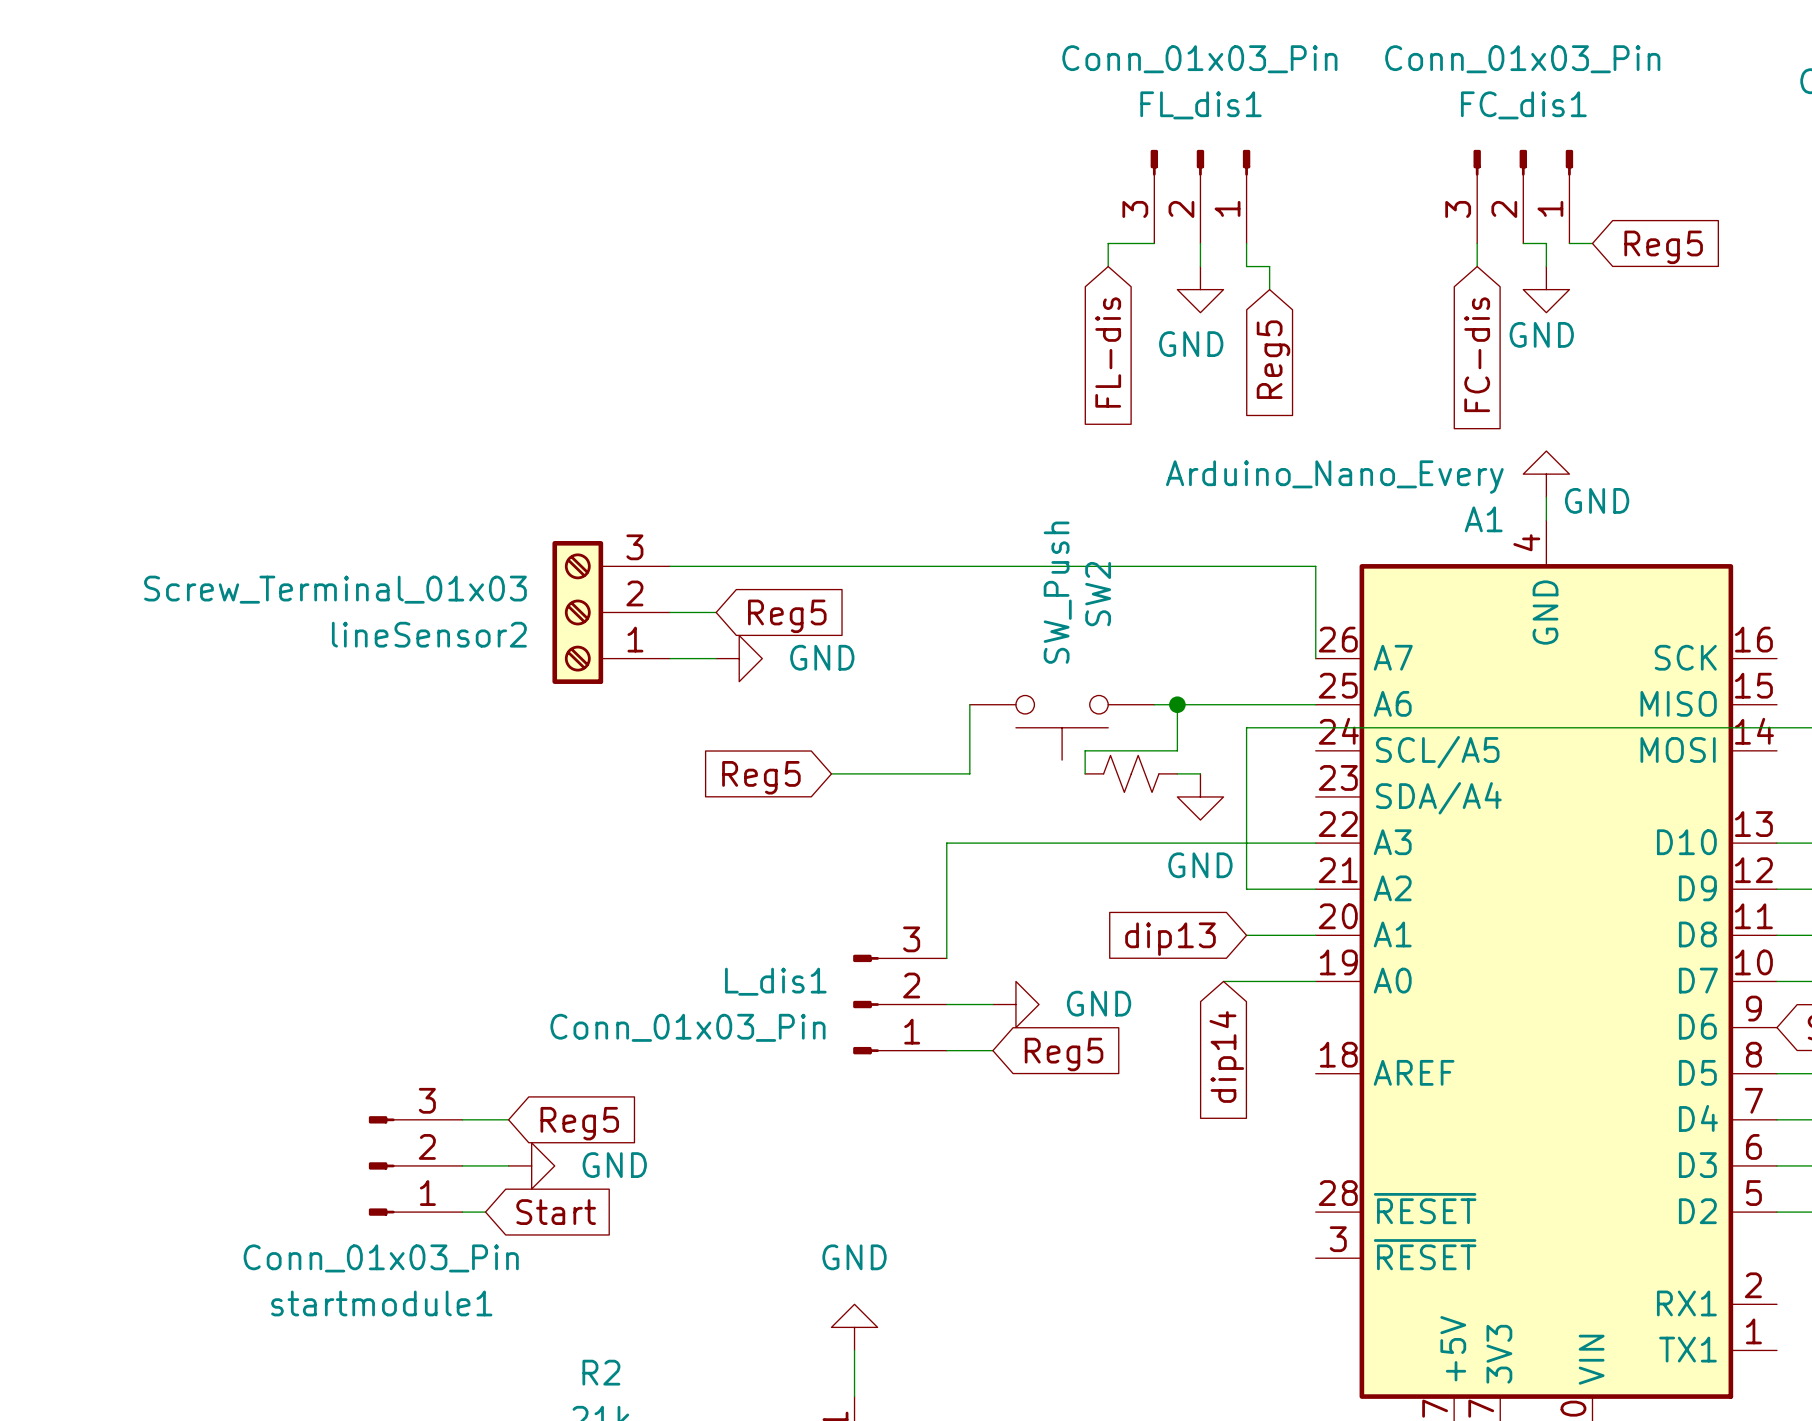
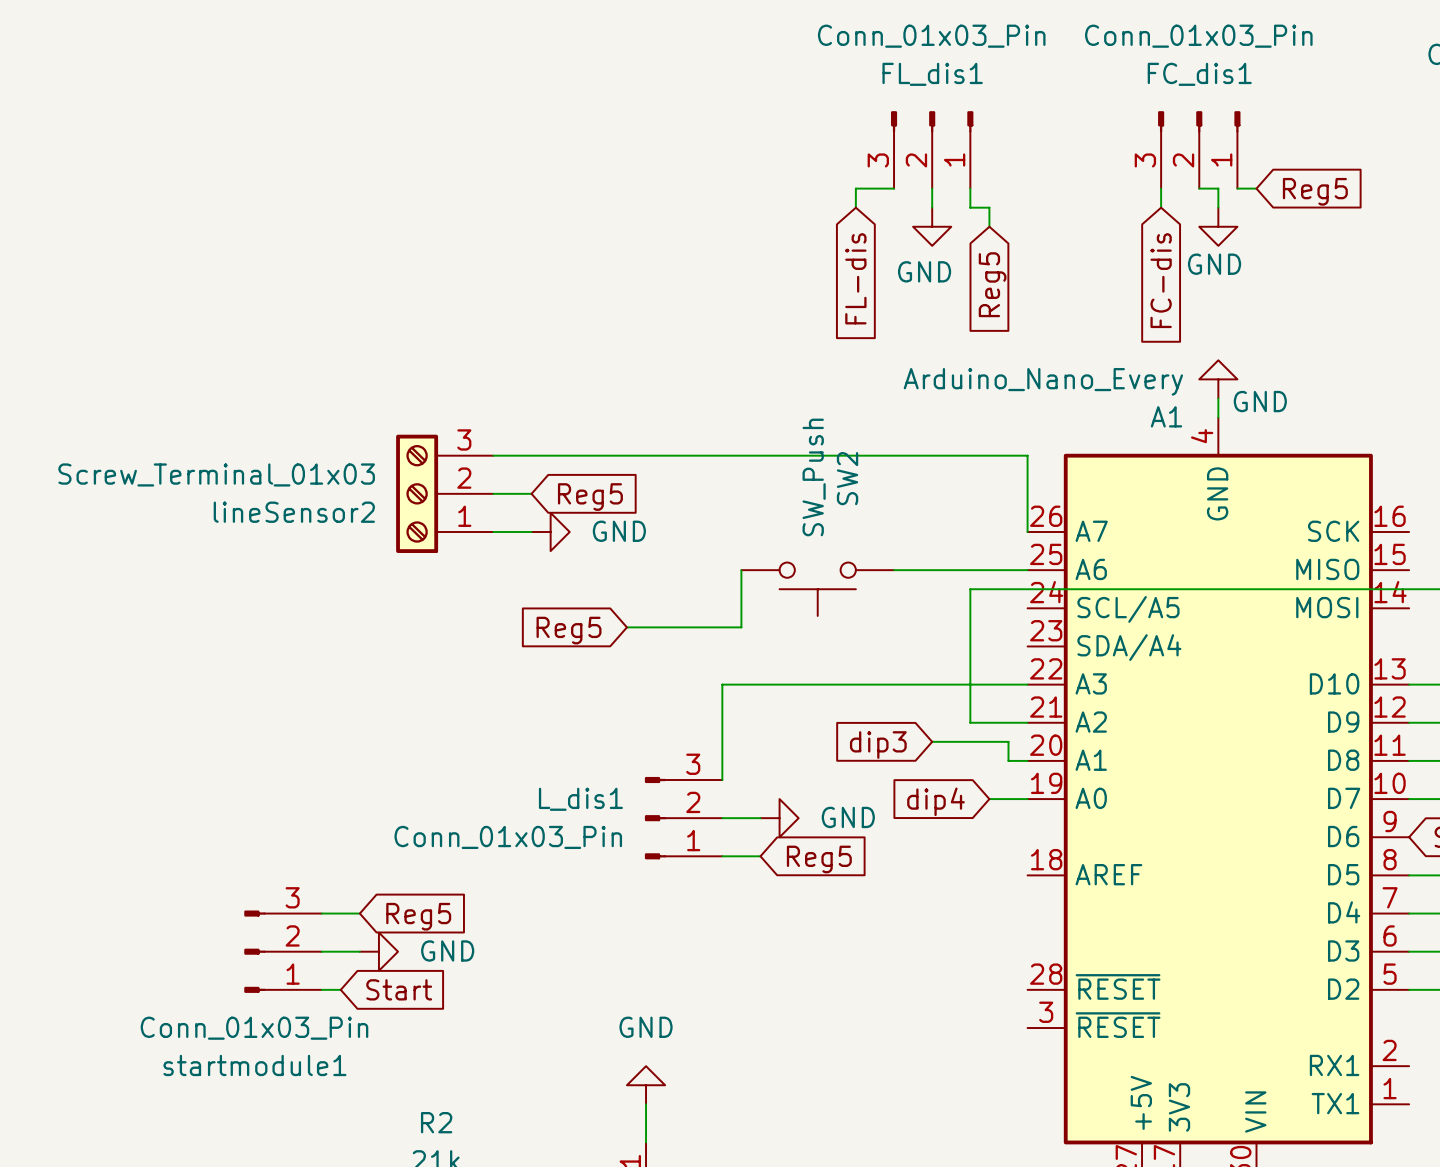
wire: (1177, 704) (1177, 750) (1085, 750) (1085, 773) -> none
junction: (1177, 704) -> none
part: (1131, 773) -> none
wire: (1177, 773) (1200, 773) -> none
power symbol: GND (1200, 796) -> none
global label: none -> dip3 (878, 745)
wire: (1246, 935) (1292, 935) -> (932, 741) (1008, 741) (1008, 760)
global label: dip13 (1170, 939) -> none
wire: (1223, 981) (1269, 981) -> none
global label: none -> dip4 (936, 801)
global label: dip14 (1226, 1056) -> none

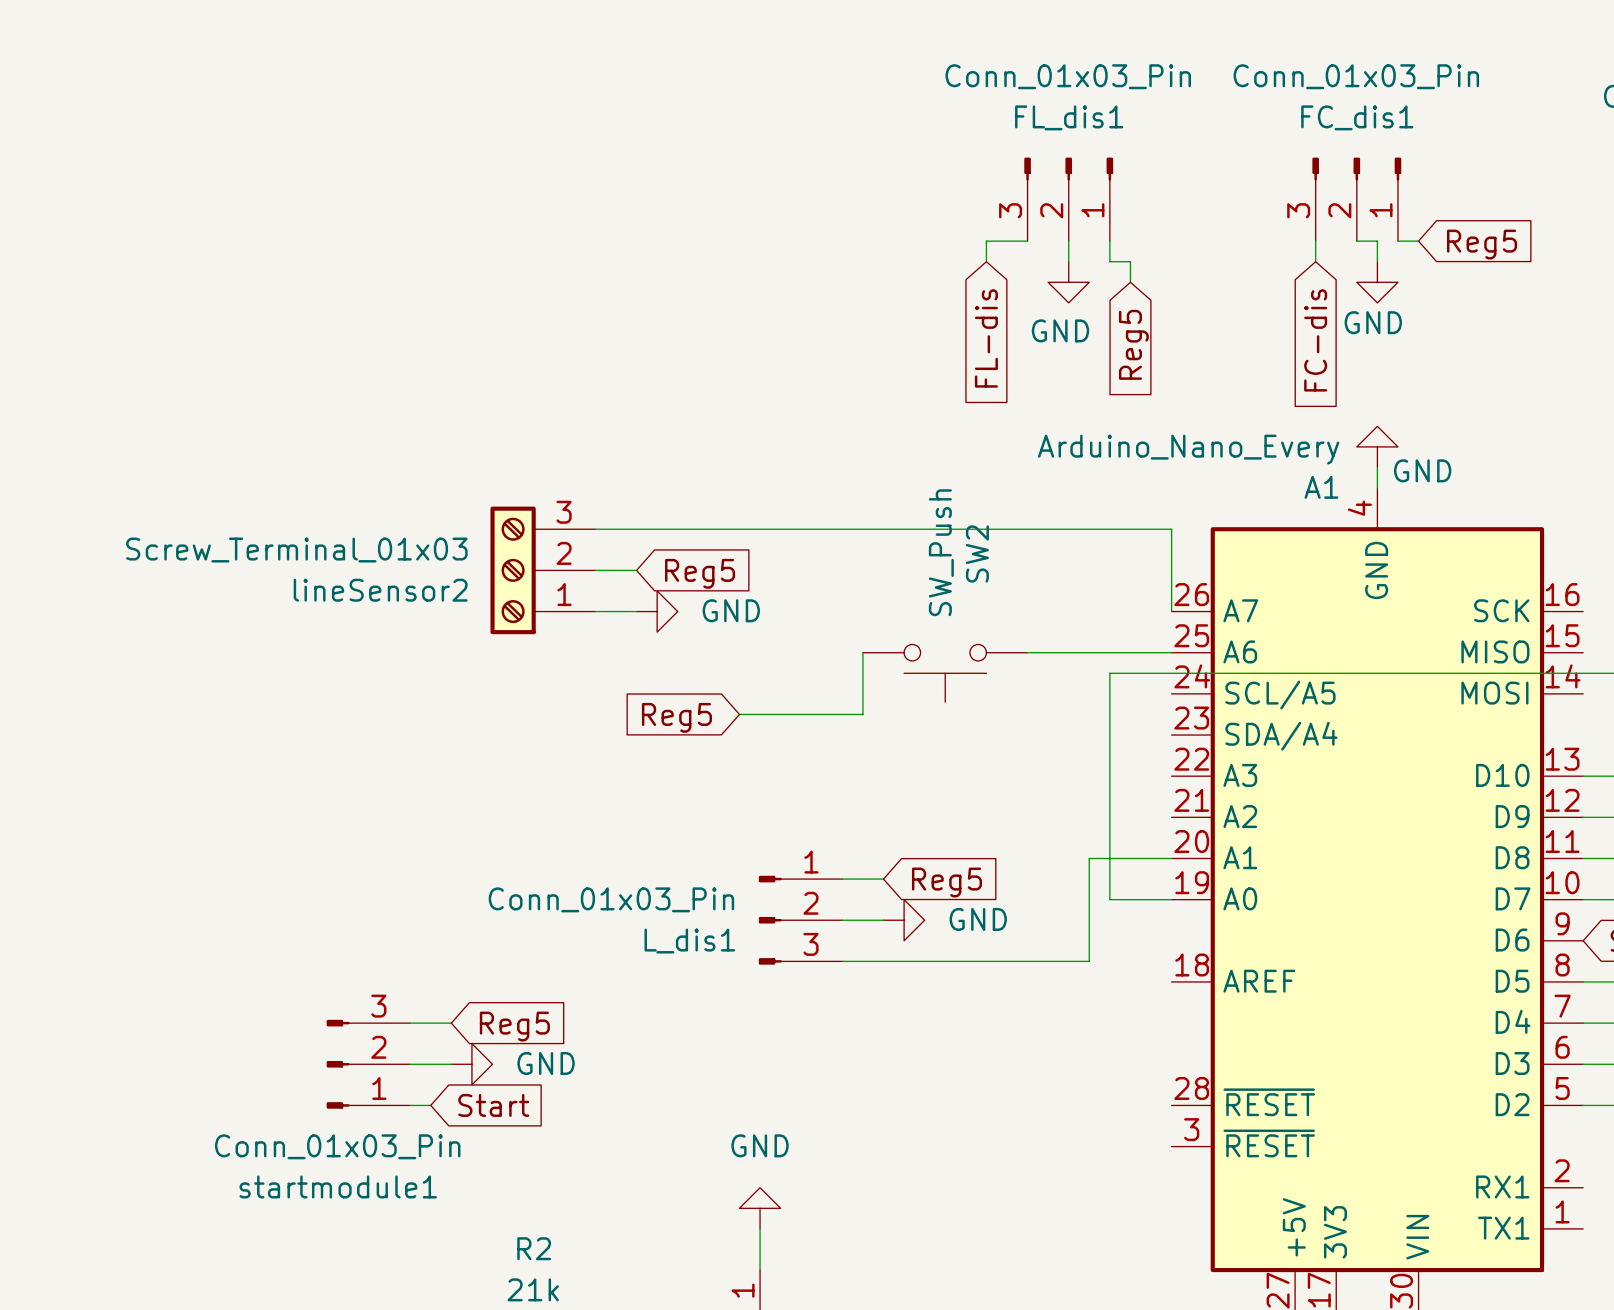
wire: (1027, 684) (722, 684) (722, 780) -> (883, 879) (842, 879)
wire: (970, 722) (1027, 722) -> (1109, 817) (1109, 899) (1130, 899)
wire: (932, 741) (1008, 741) (1008, 760) -> (883, 961) (1089, 961) (1089, 858) (1151, 858)
global label: dip3 (878, 745) -> none
global label: dip4 (936, 801) -> none
L_dis1 flip: as is (655, 818) -> up-down (770, 920)
global label position: Reg5 (819, 859) -> Reg5 (947, 882)

